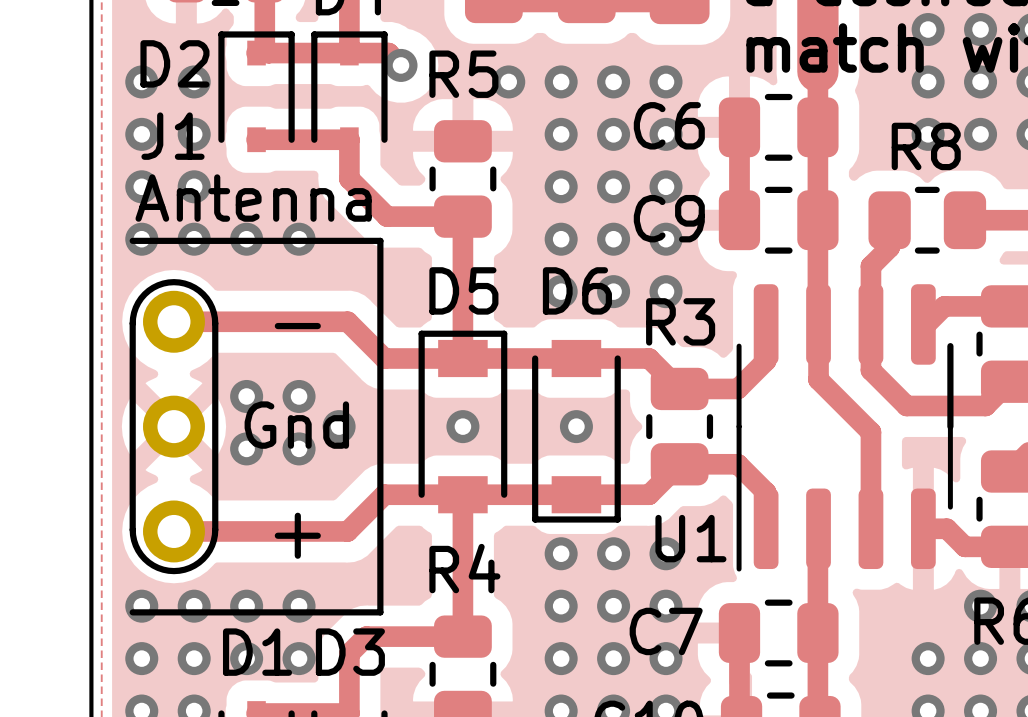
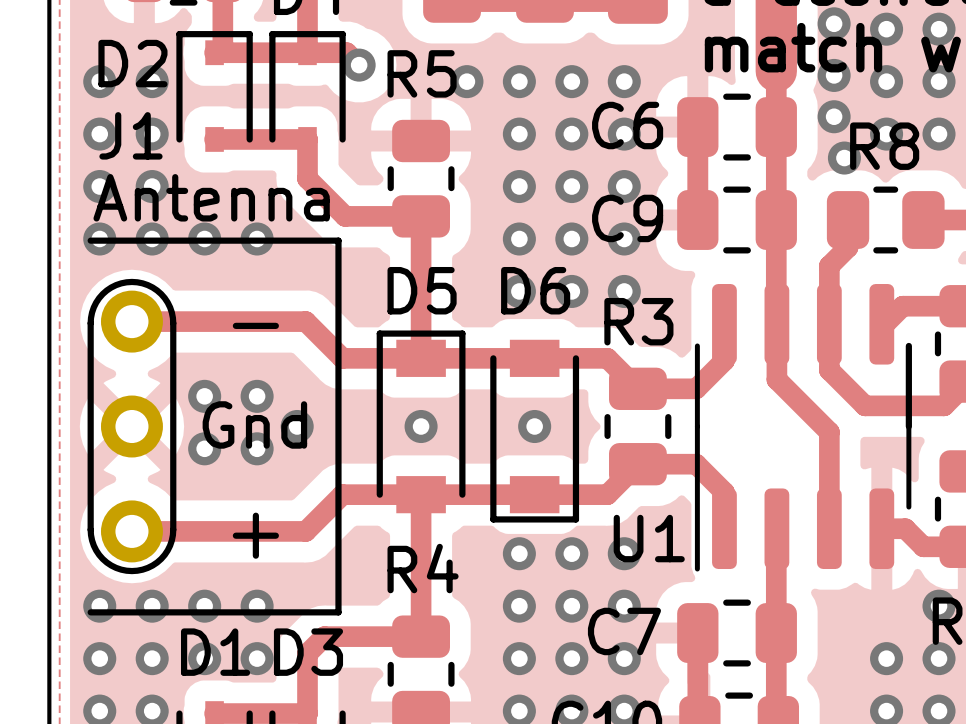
via: none -> (834, 23)
via: none -> (834, 75)
via: none -> (834, 116)
via: none -> (844, 158)

